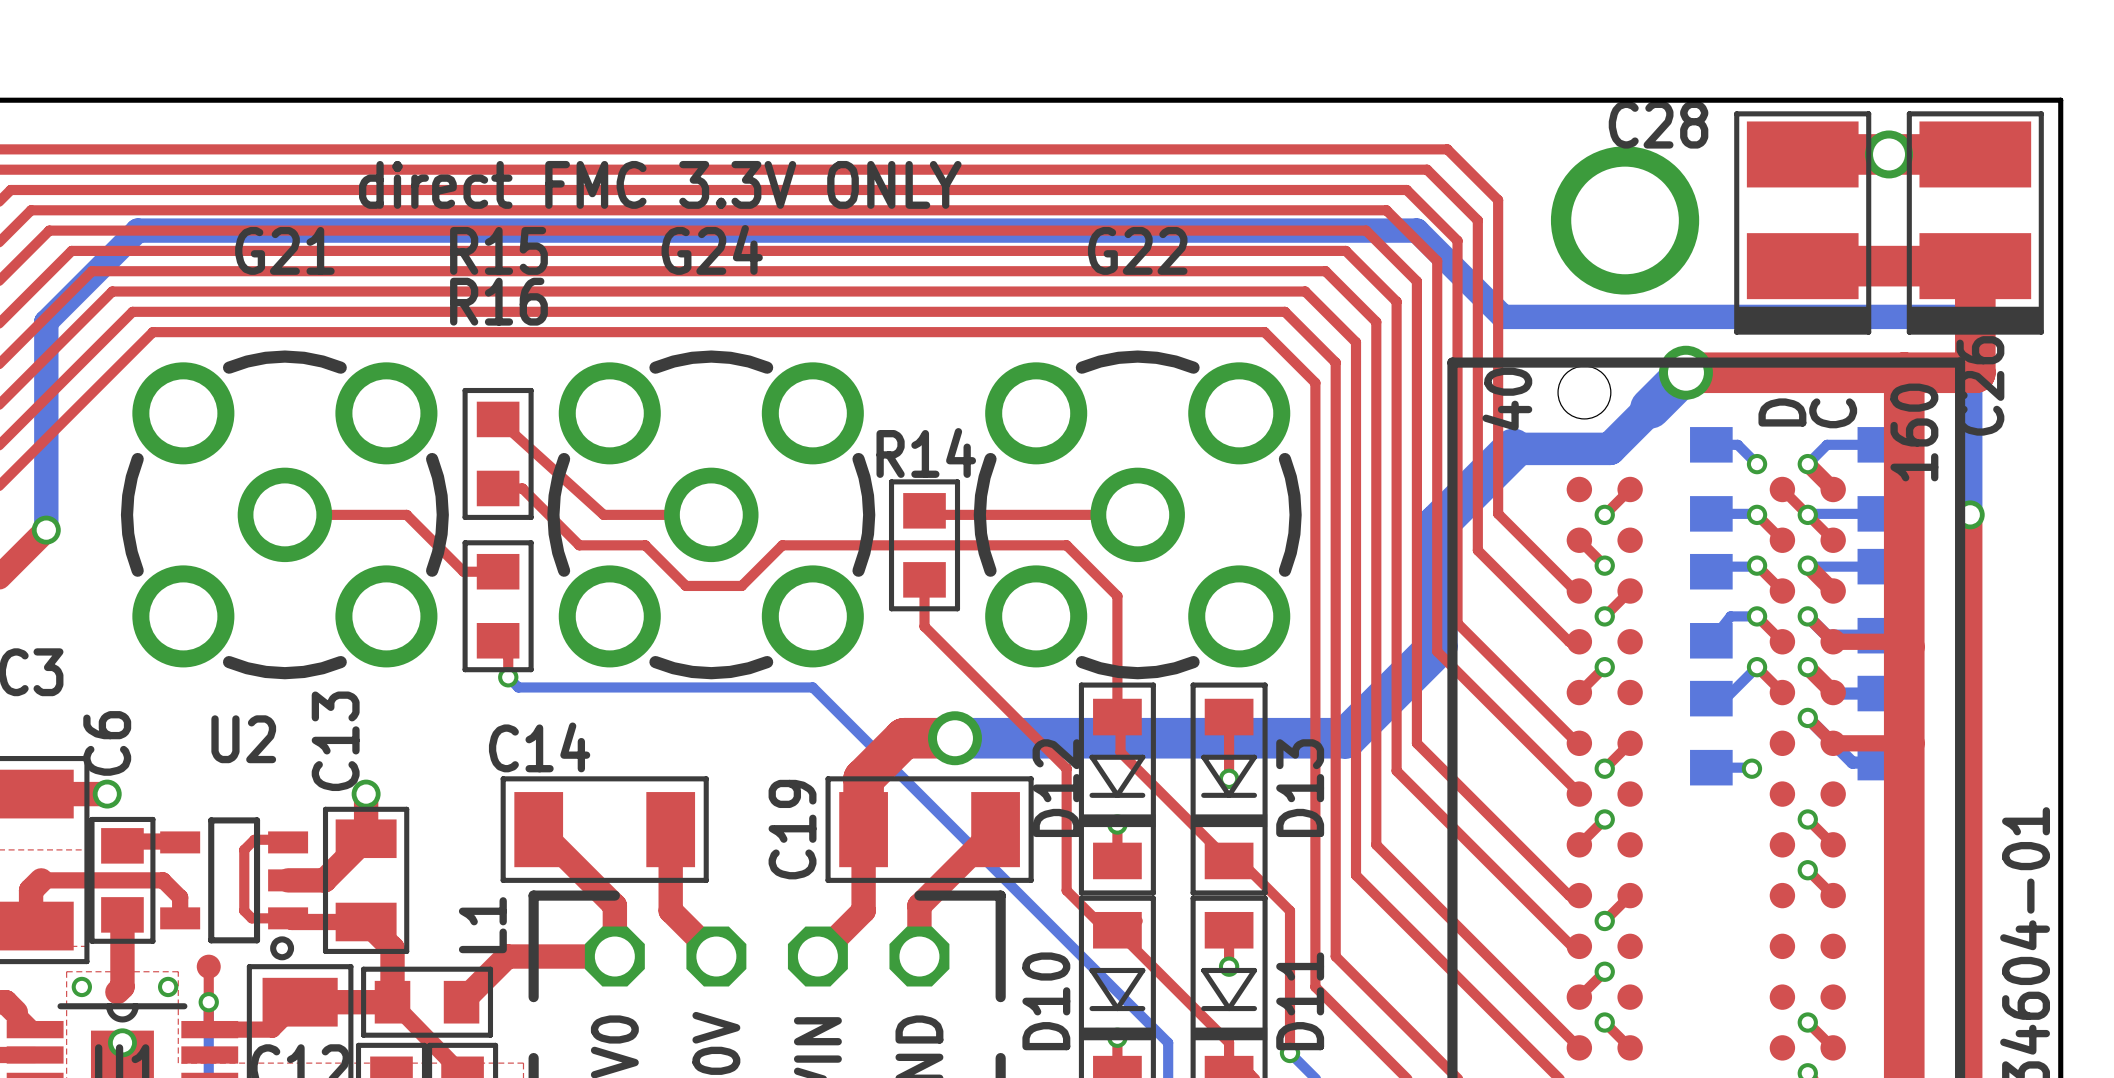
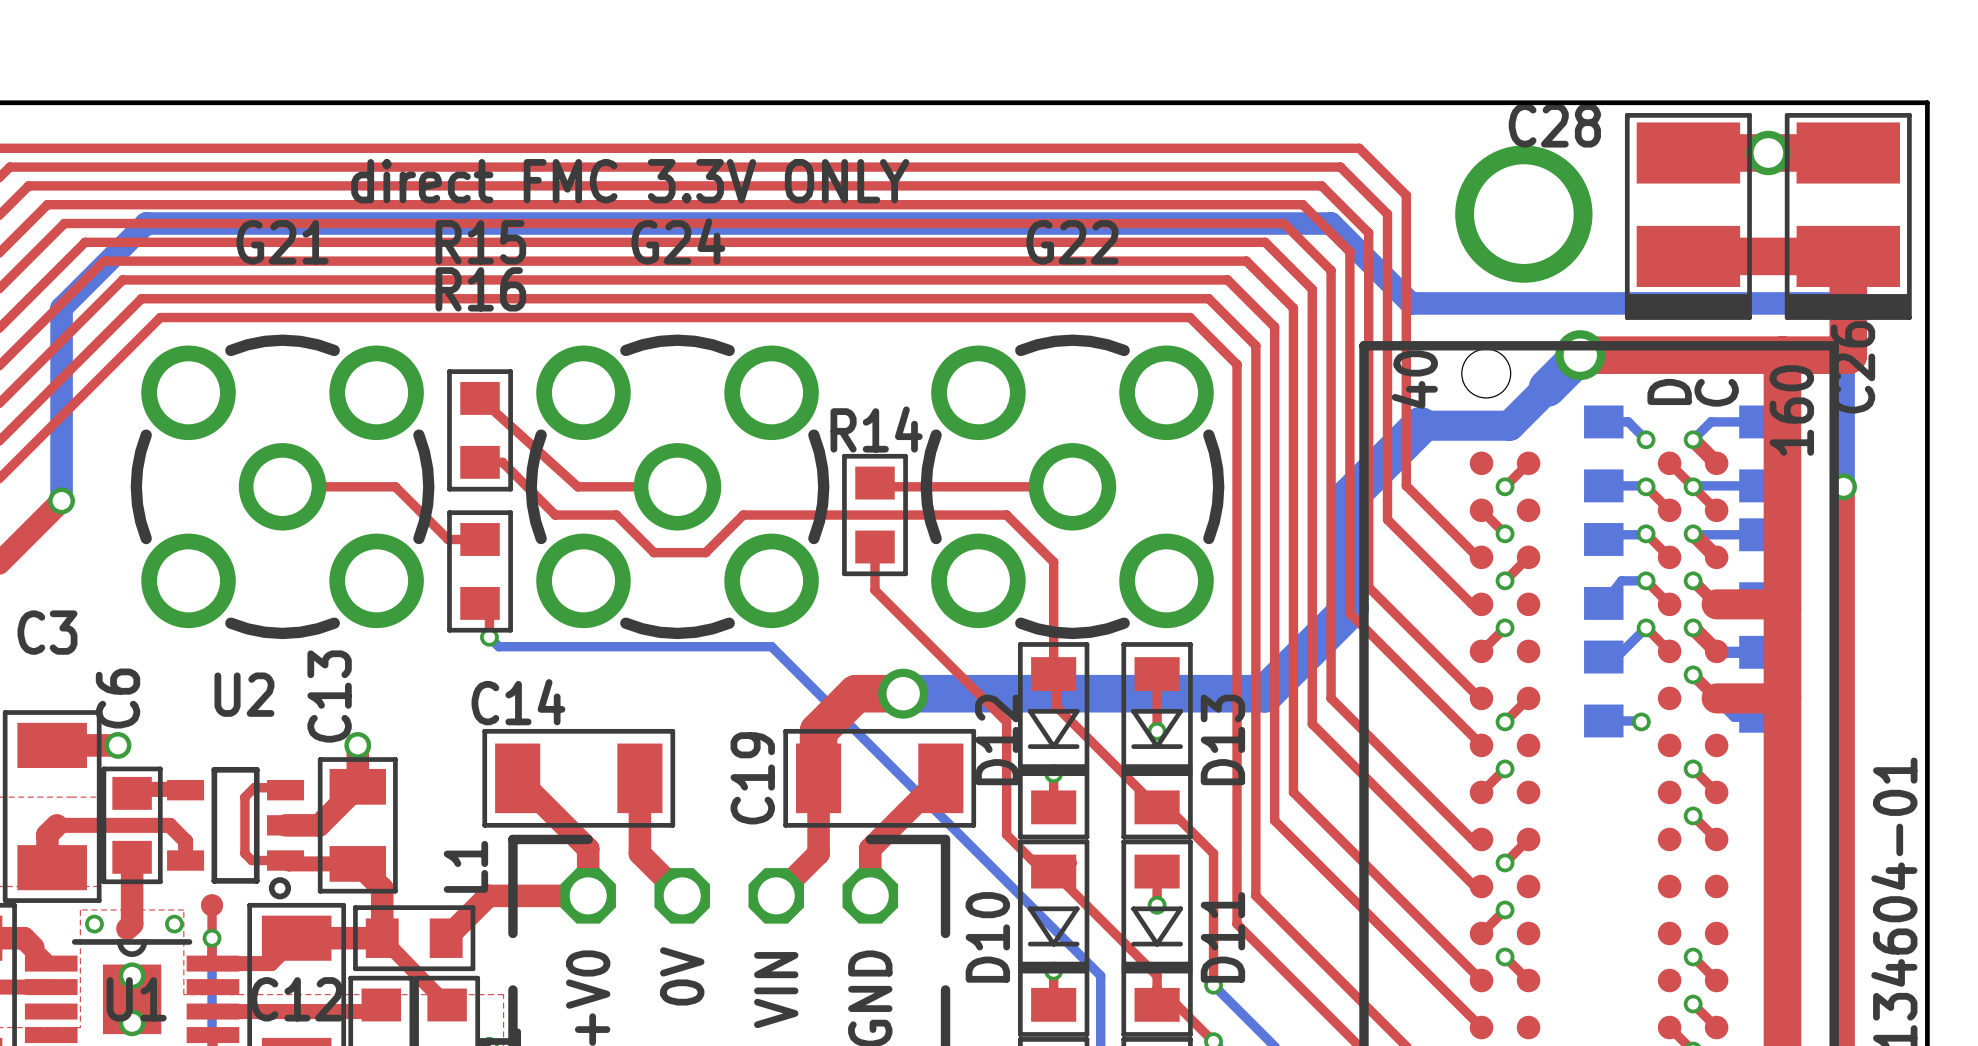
top track width: thin (1833, 641) (1899, 641) -> thick (1716, 604) (1777, 604)
top track width: thin (1833, 743) (1894, 743) -> thick (1716, 698) (1773, 698)

